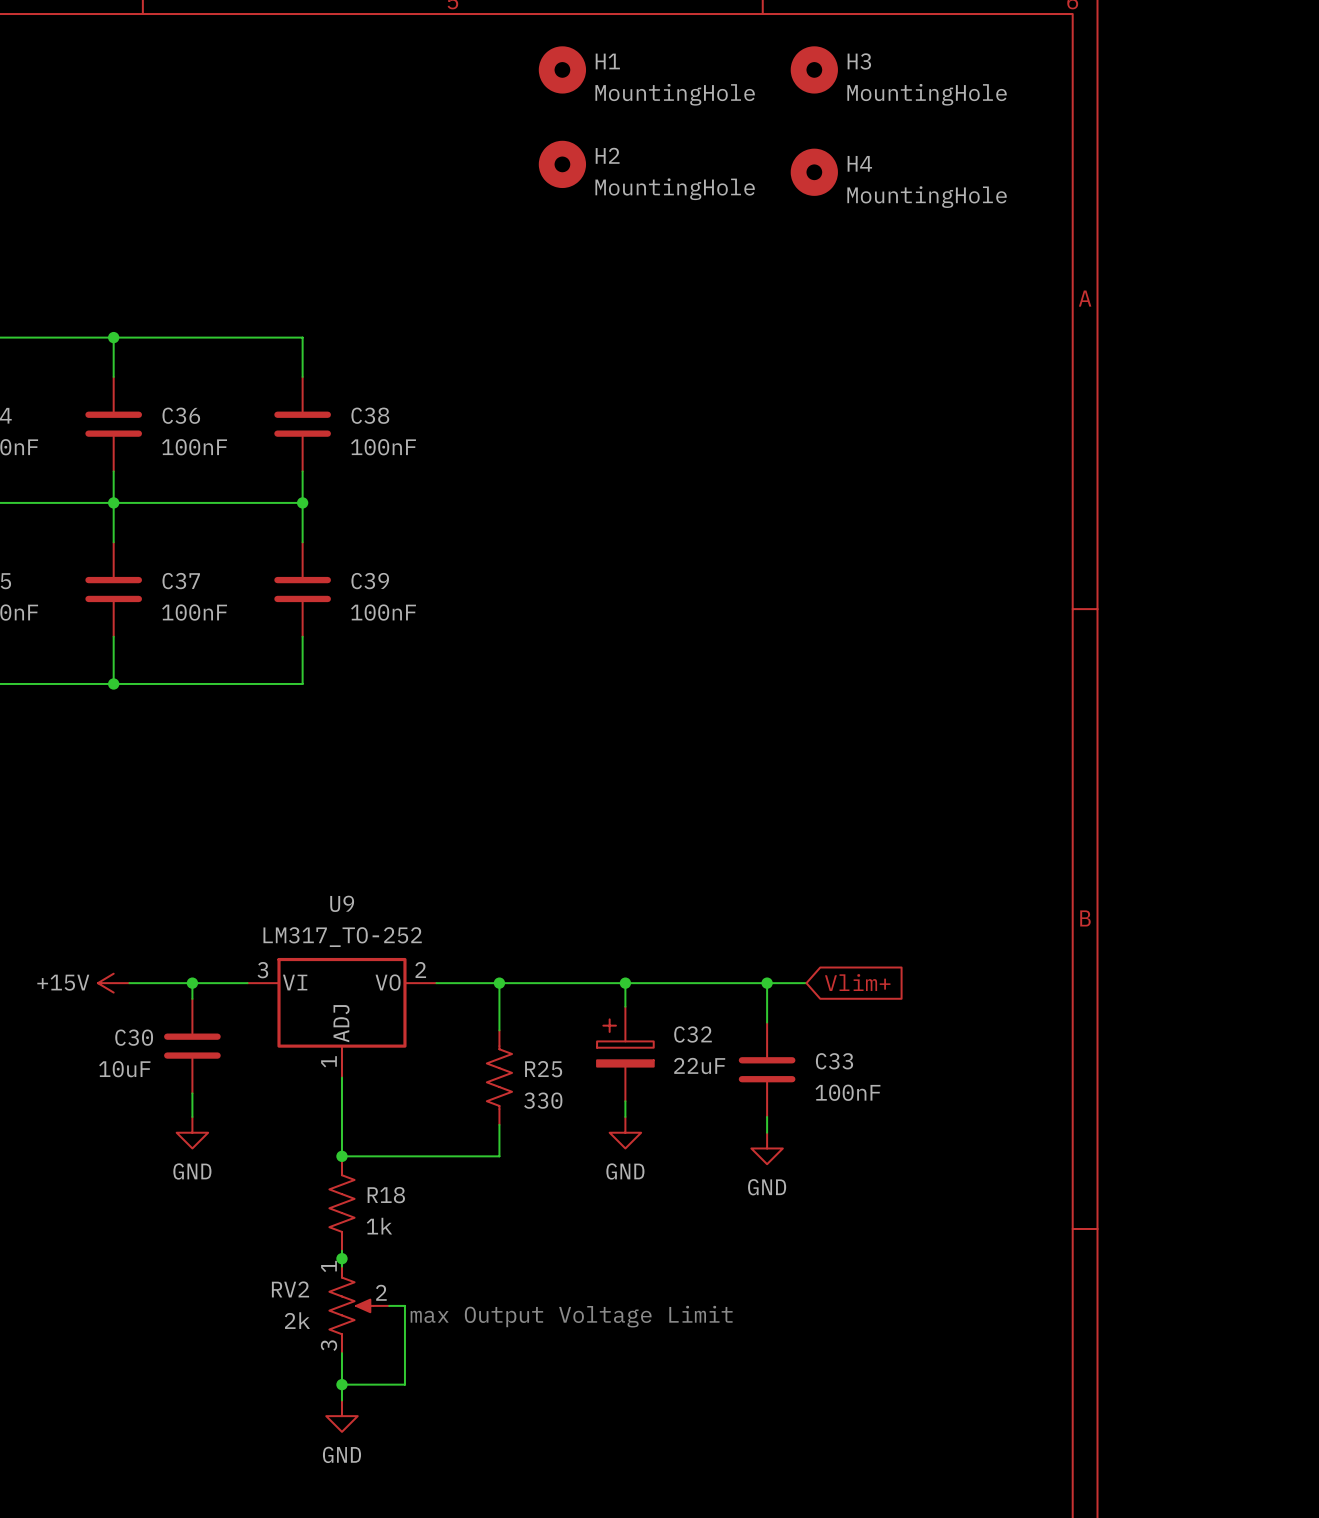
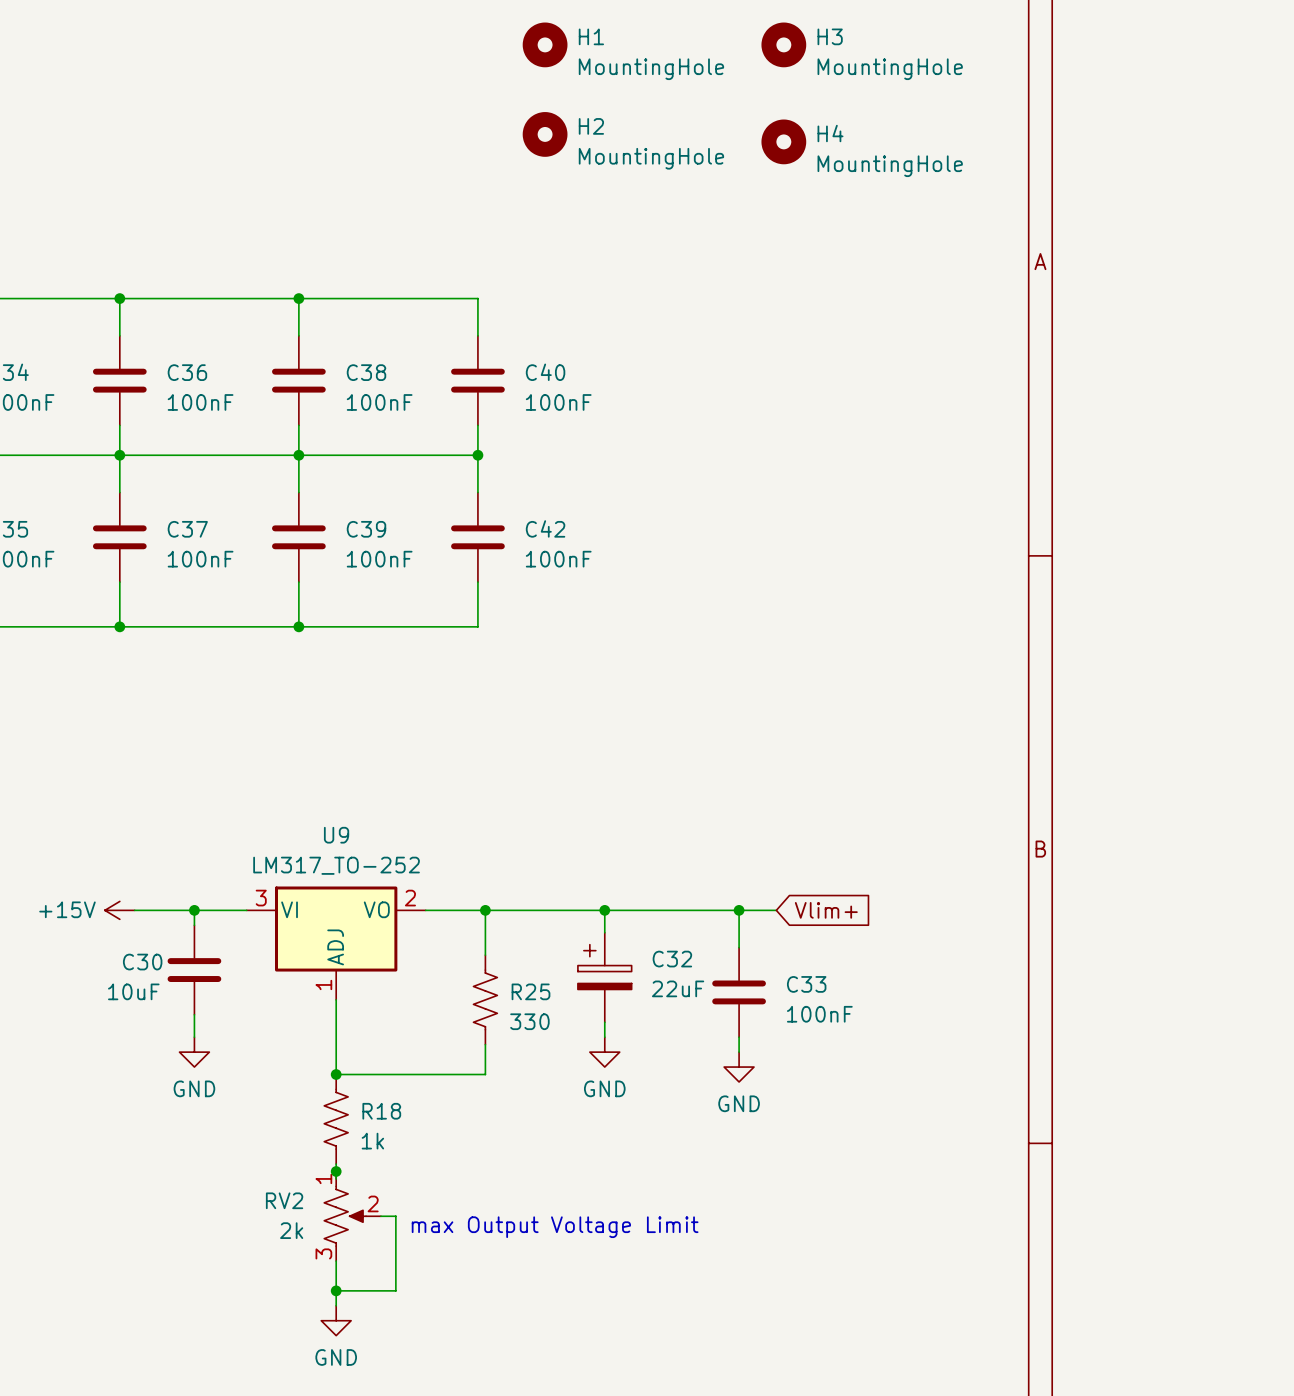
wire: none -> (298, 298) (477, 298) (477, 335)
junction: none -> (298, 298)
C40: none -> 100nF (477, 380)
wire: none -> (477, 425) (477, 492)
wire: none -> (298, 455) (477, 455)
junction: none -> (477, 455)
C42: none -> 100nF (477, 537)
wire: none -> (477, 582) (477, 626) (298, 626)
junction: none -> (298, 626)

